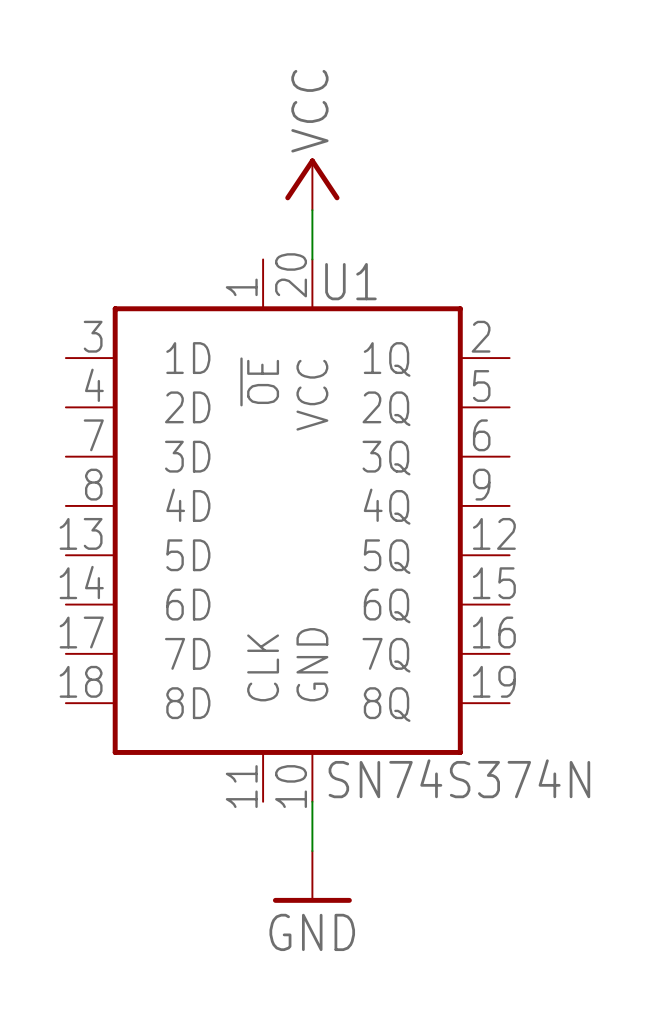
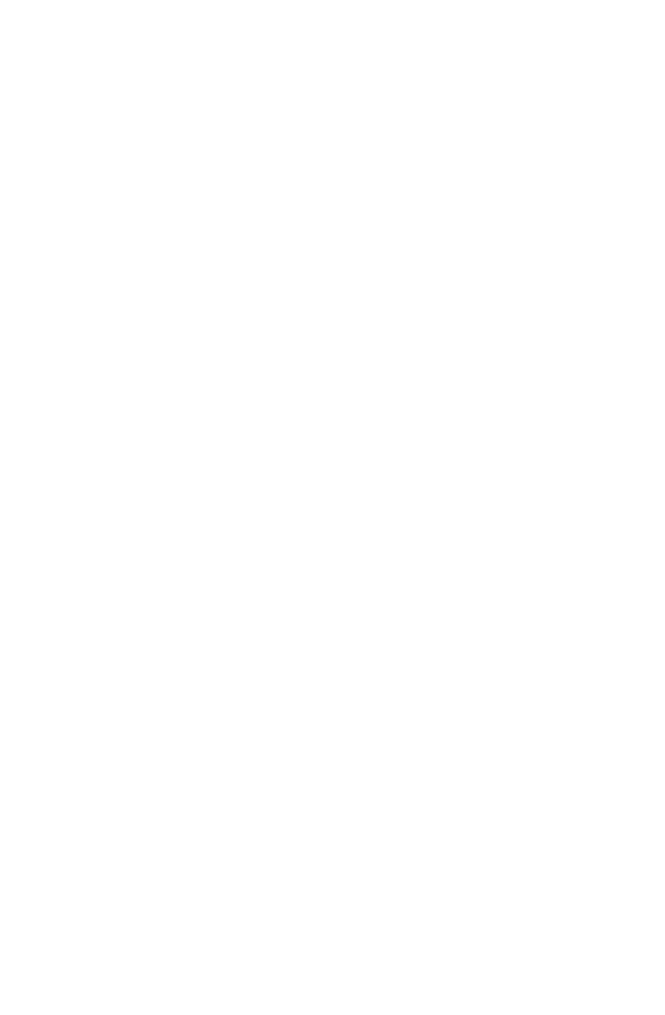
power symbol: VCC (312, 184) -> none
wire: (312, 210) (312, 259) -> none
U1: SN74S374N (287, 530) -> none
wire: (312, 801) (312, 851) -> none
power symbol: GND (312, 876) -> none

